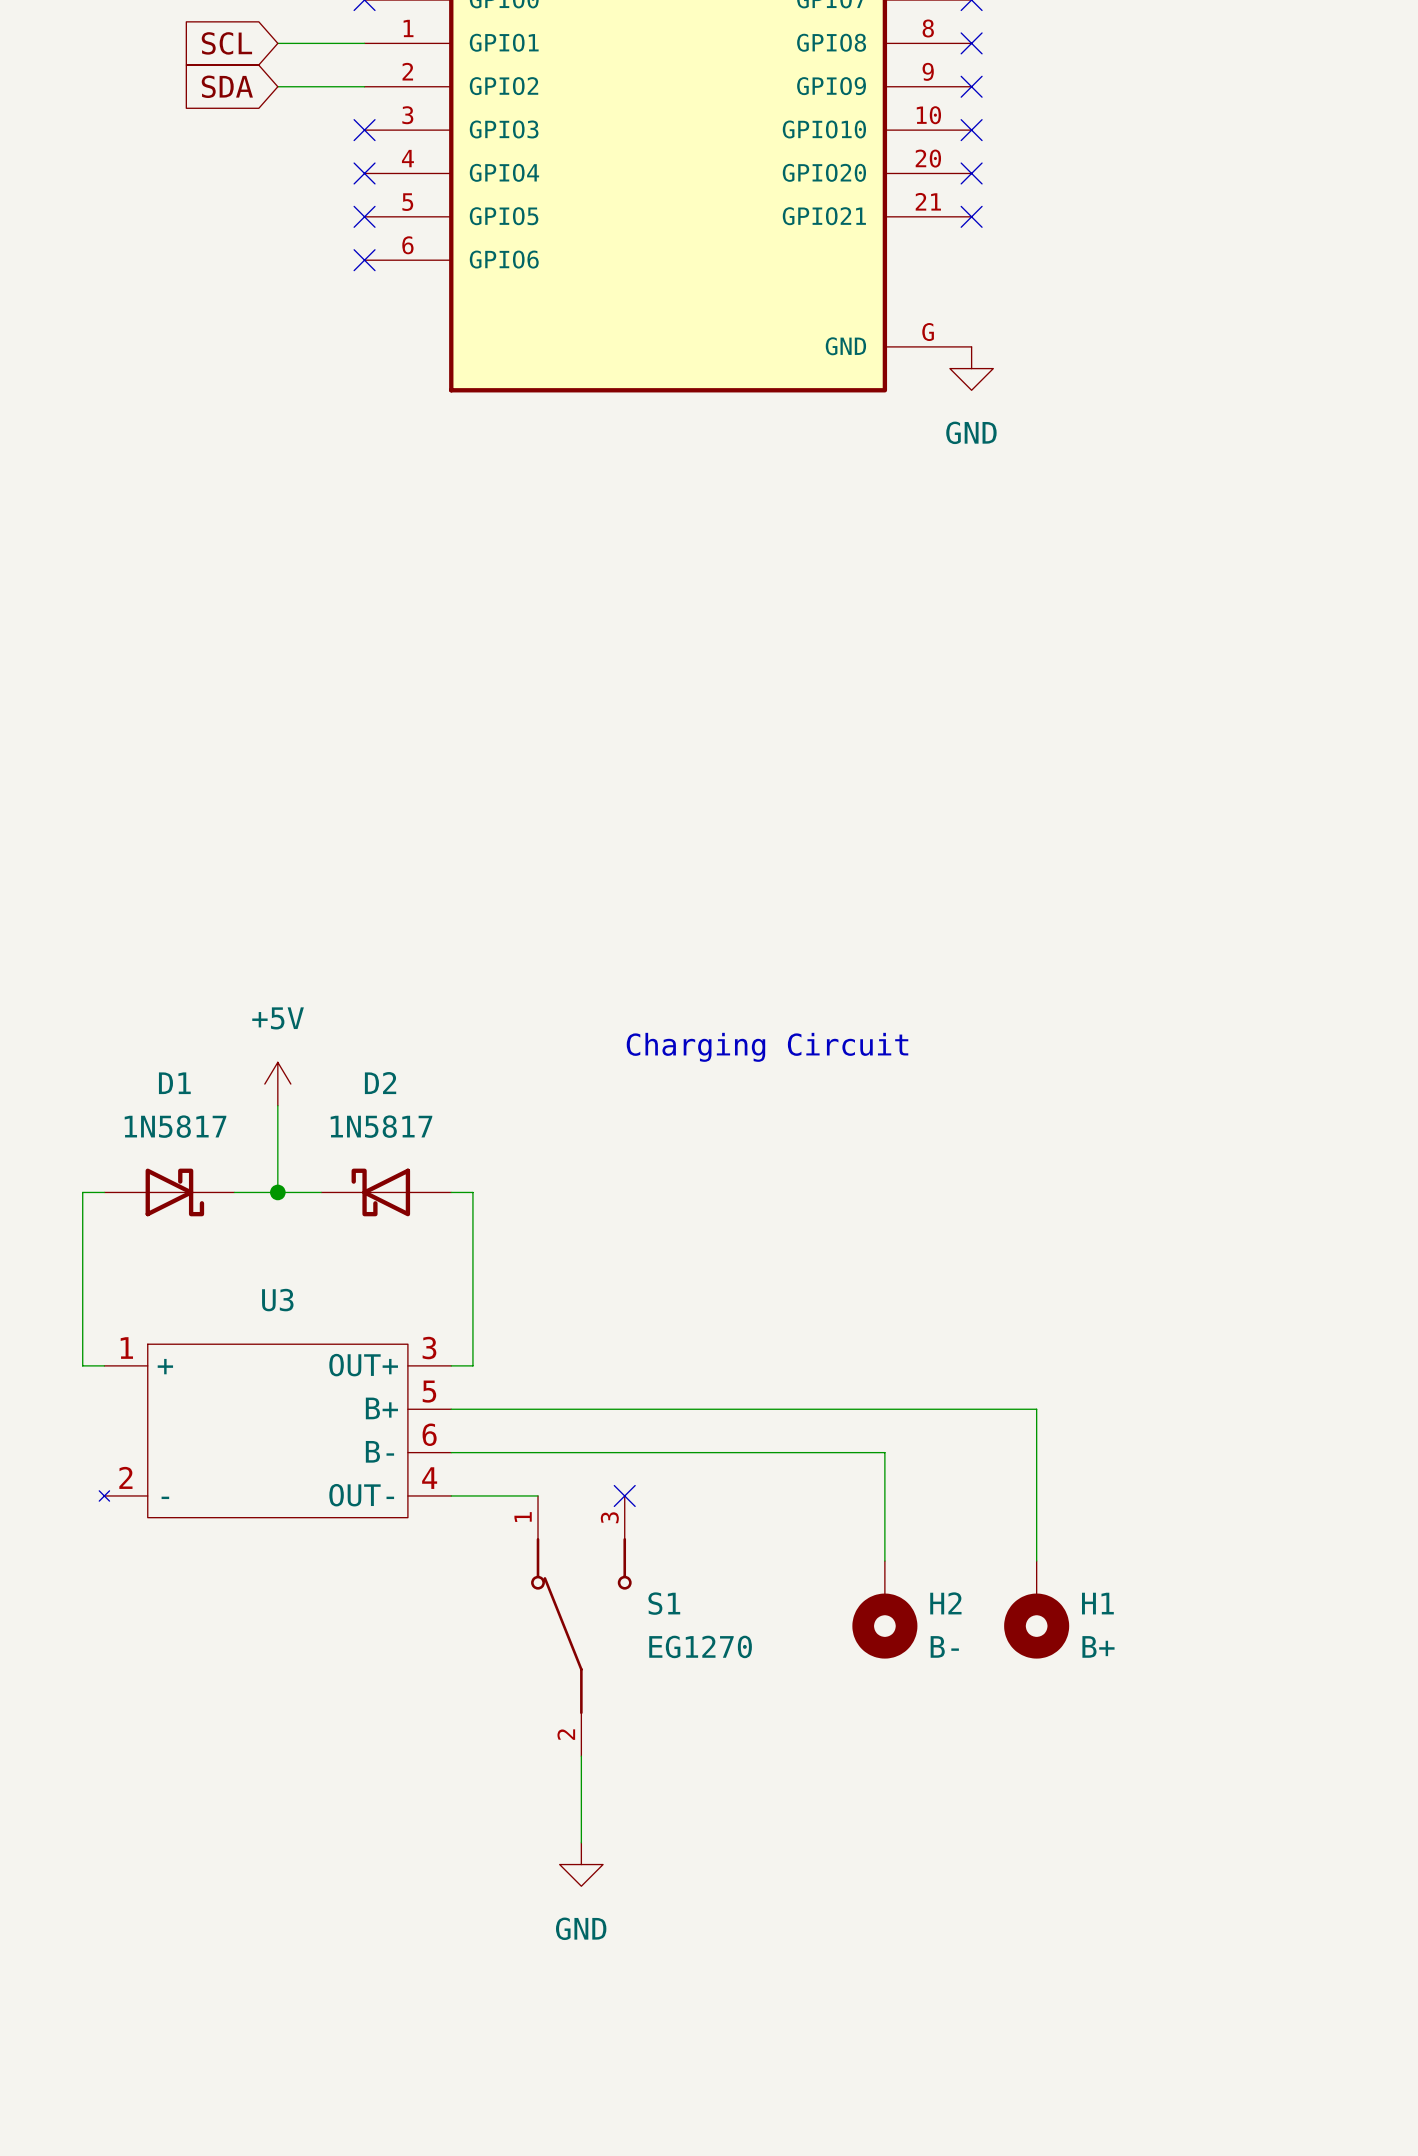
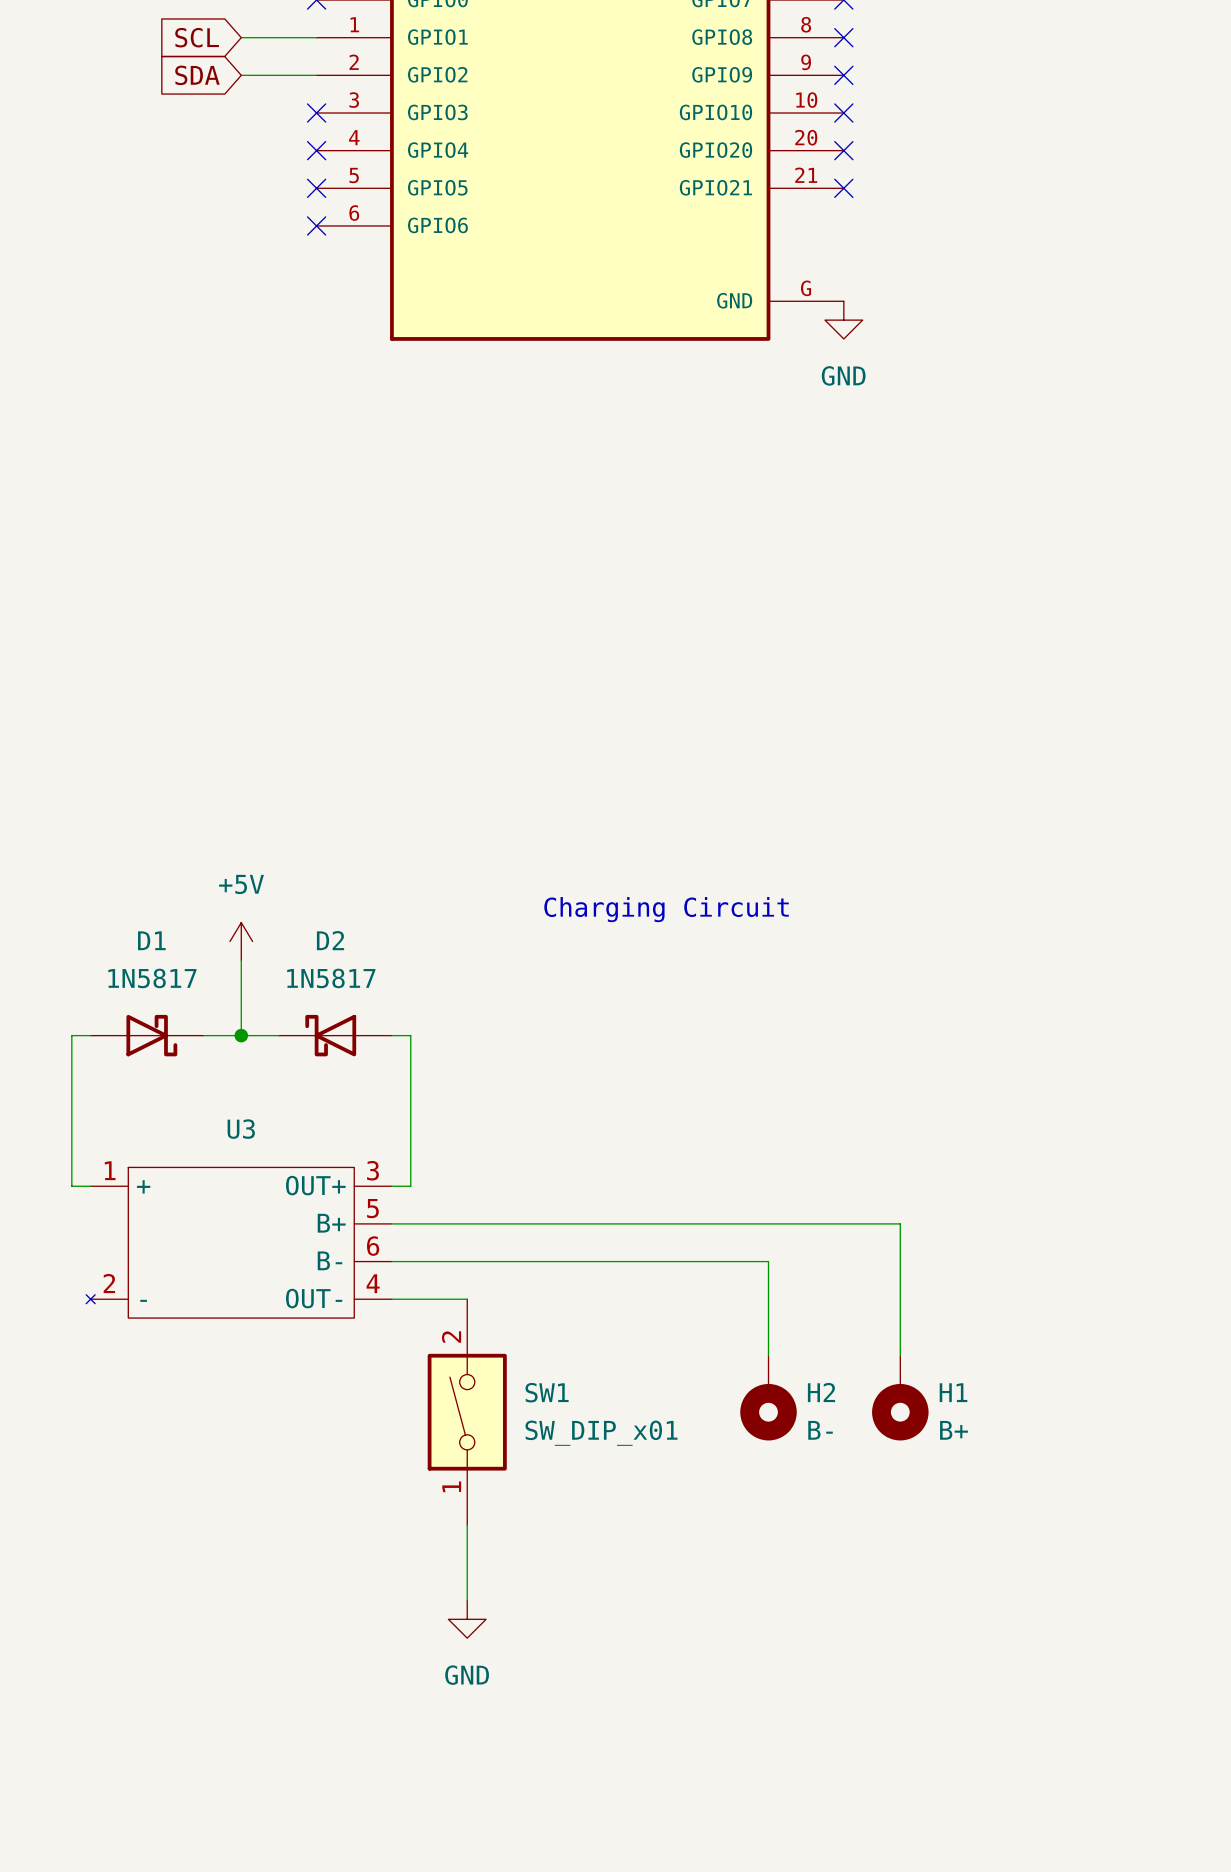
no-connect mark: (624, 1495) -> none
SW1: none -> SW_DIP_x01 (467, 1412)
S1: EG1270 (581, 1626) -> none
wire: (581, 1756) (581, 1842) -> (467, 1525) (467, 1600)
power symbol position: GND (581, 1864) -> GND (467, 1619)

